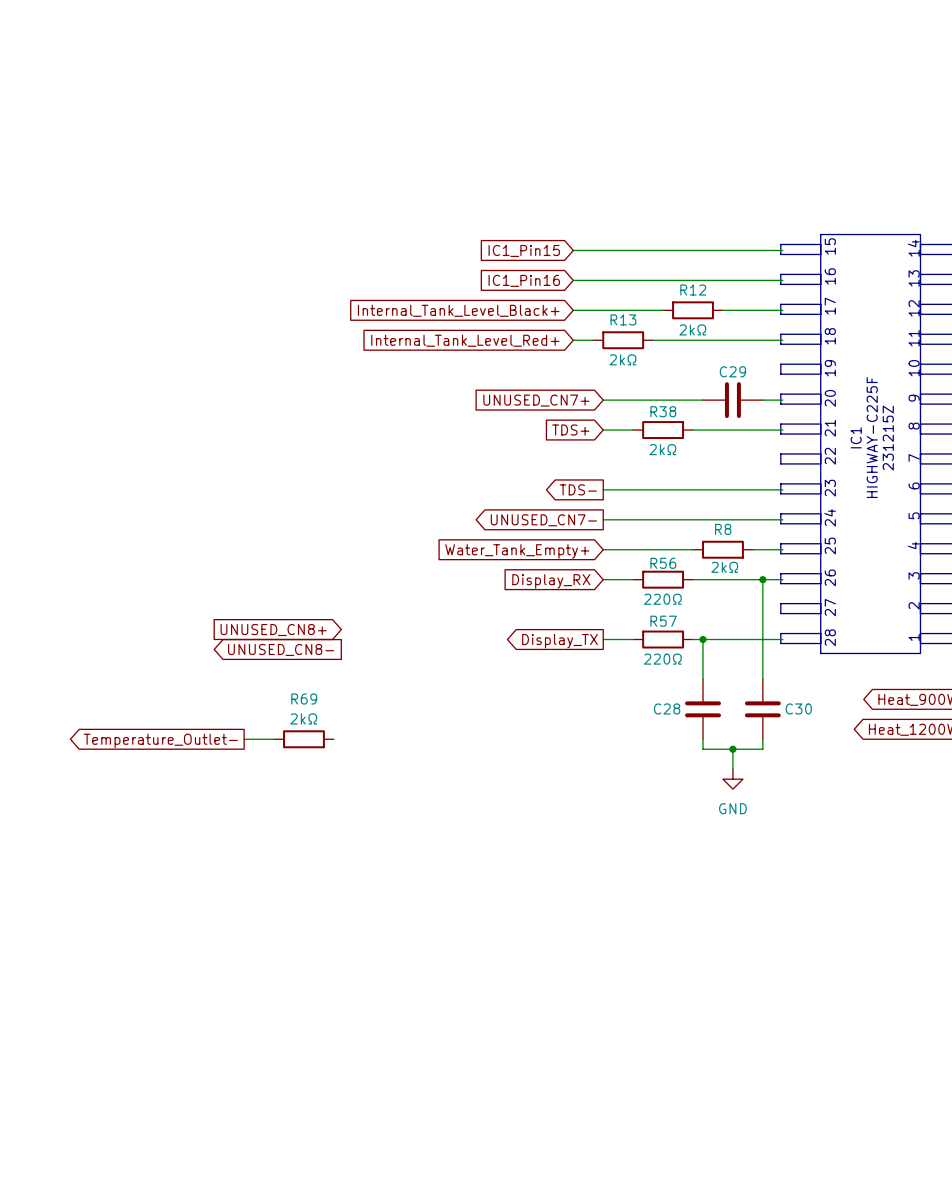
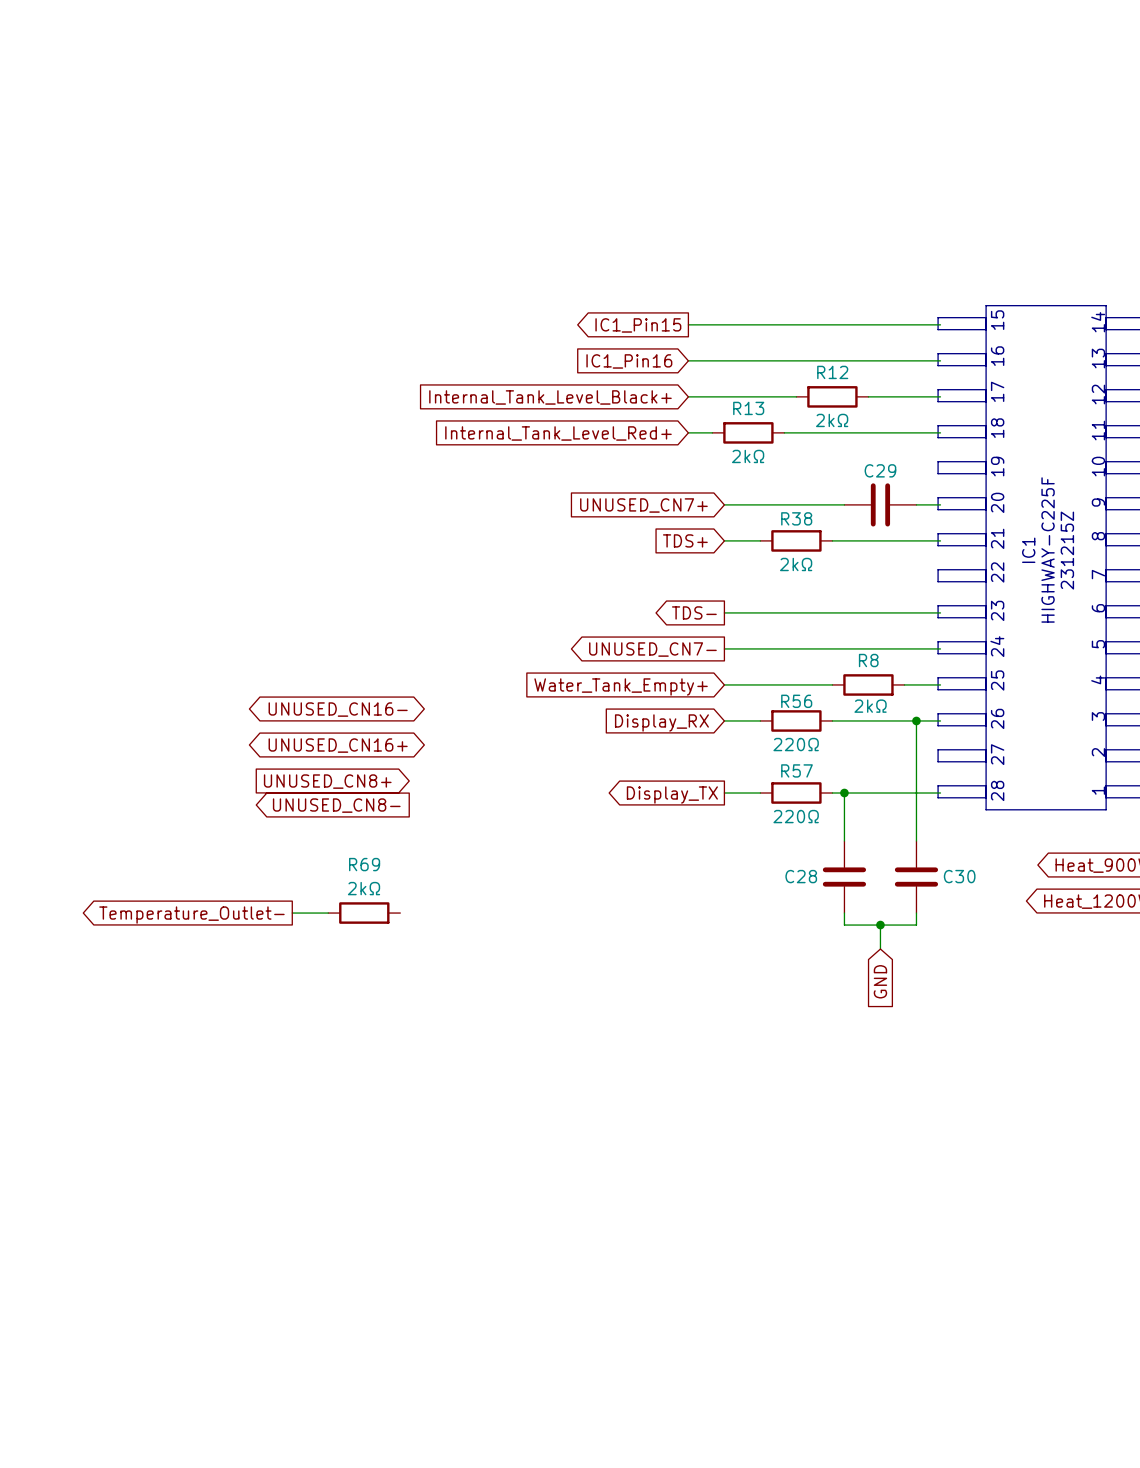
global label shape: input (524, 250) -> output (638, 325)
global label: none -> UNUSED_CN16- (338, 709)
global label: none -> UNUSED_CN16+ (338, 745)
power symbol: GND (732, 779) -> none
global label: none -> GND (880, 981)

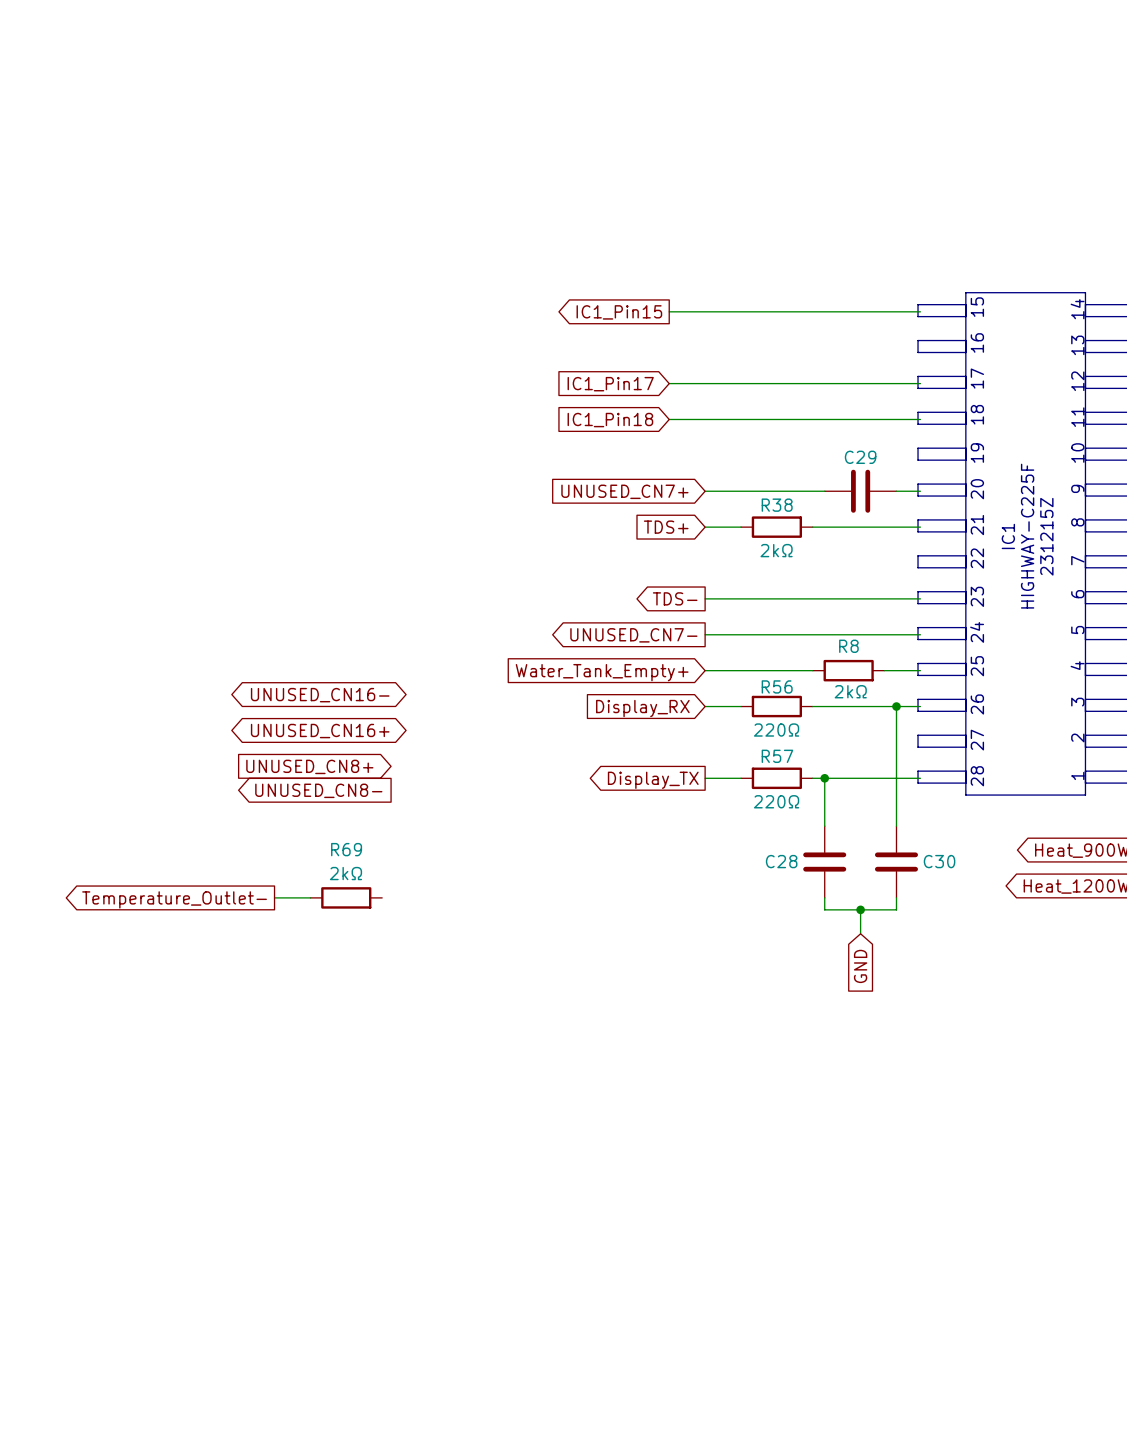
wire: (688, 360) (940, 360) -> none
global label: IC1_Pin16 (629, 361) -> none
wire: none -> (776, 383) (848, 383)
R12: 2kΩ (832, 396) -> none
global label: Internal_Tank_Level_Black+ (550, 397) -> IC1_Pin17 (610, 384)
wire: none -> (693, 419) (764, 419)
R13: 2kΩ (748, 432) -> none
global label: Internal_Tank_Level_Red+ (558, 433) -> IC1_Pin18 (610, 420)

